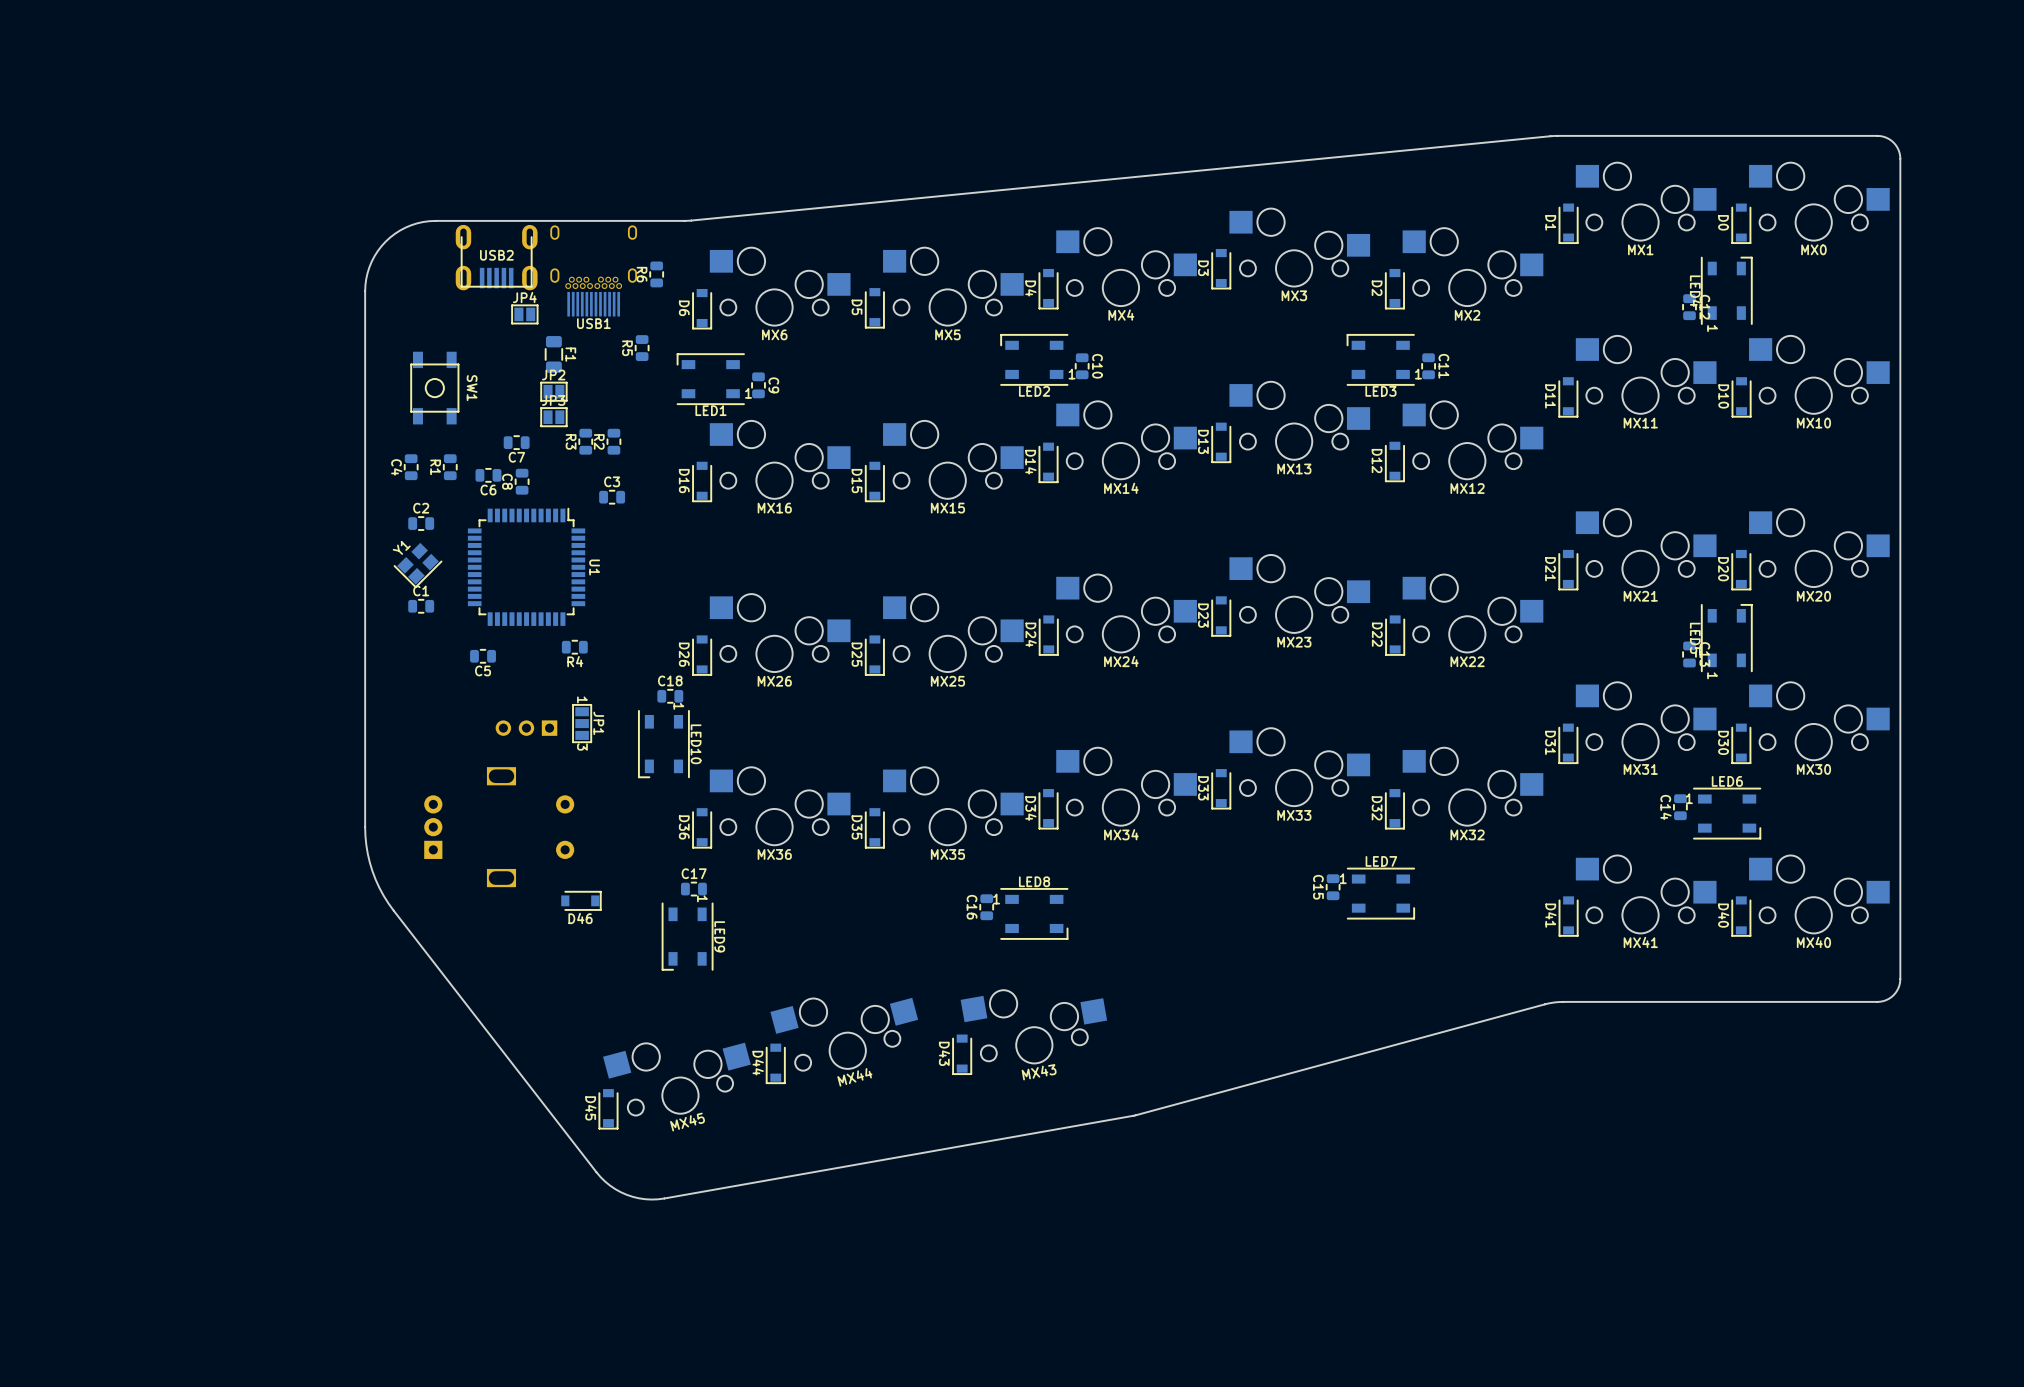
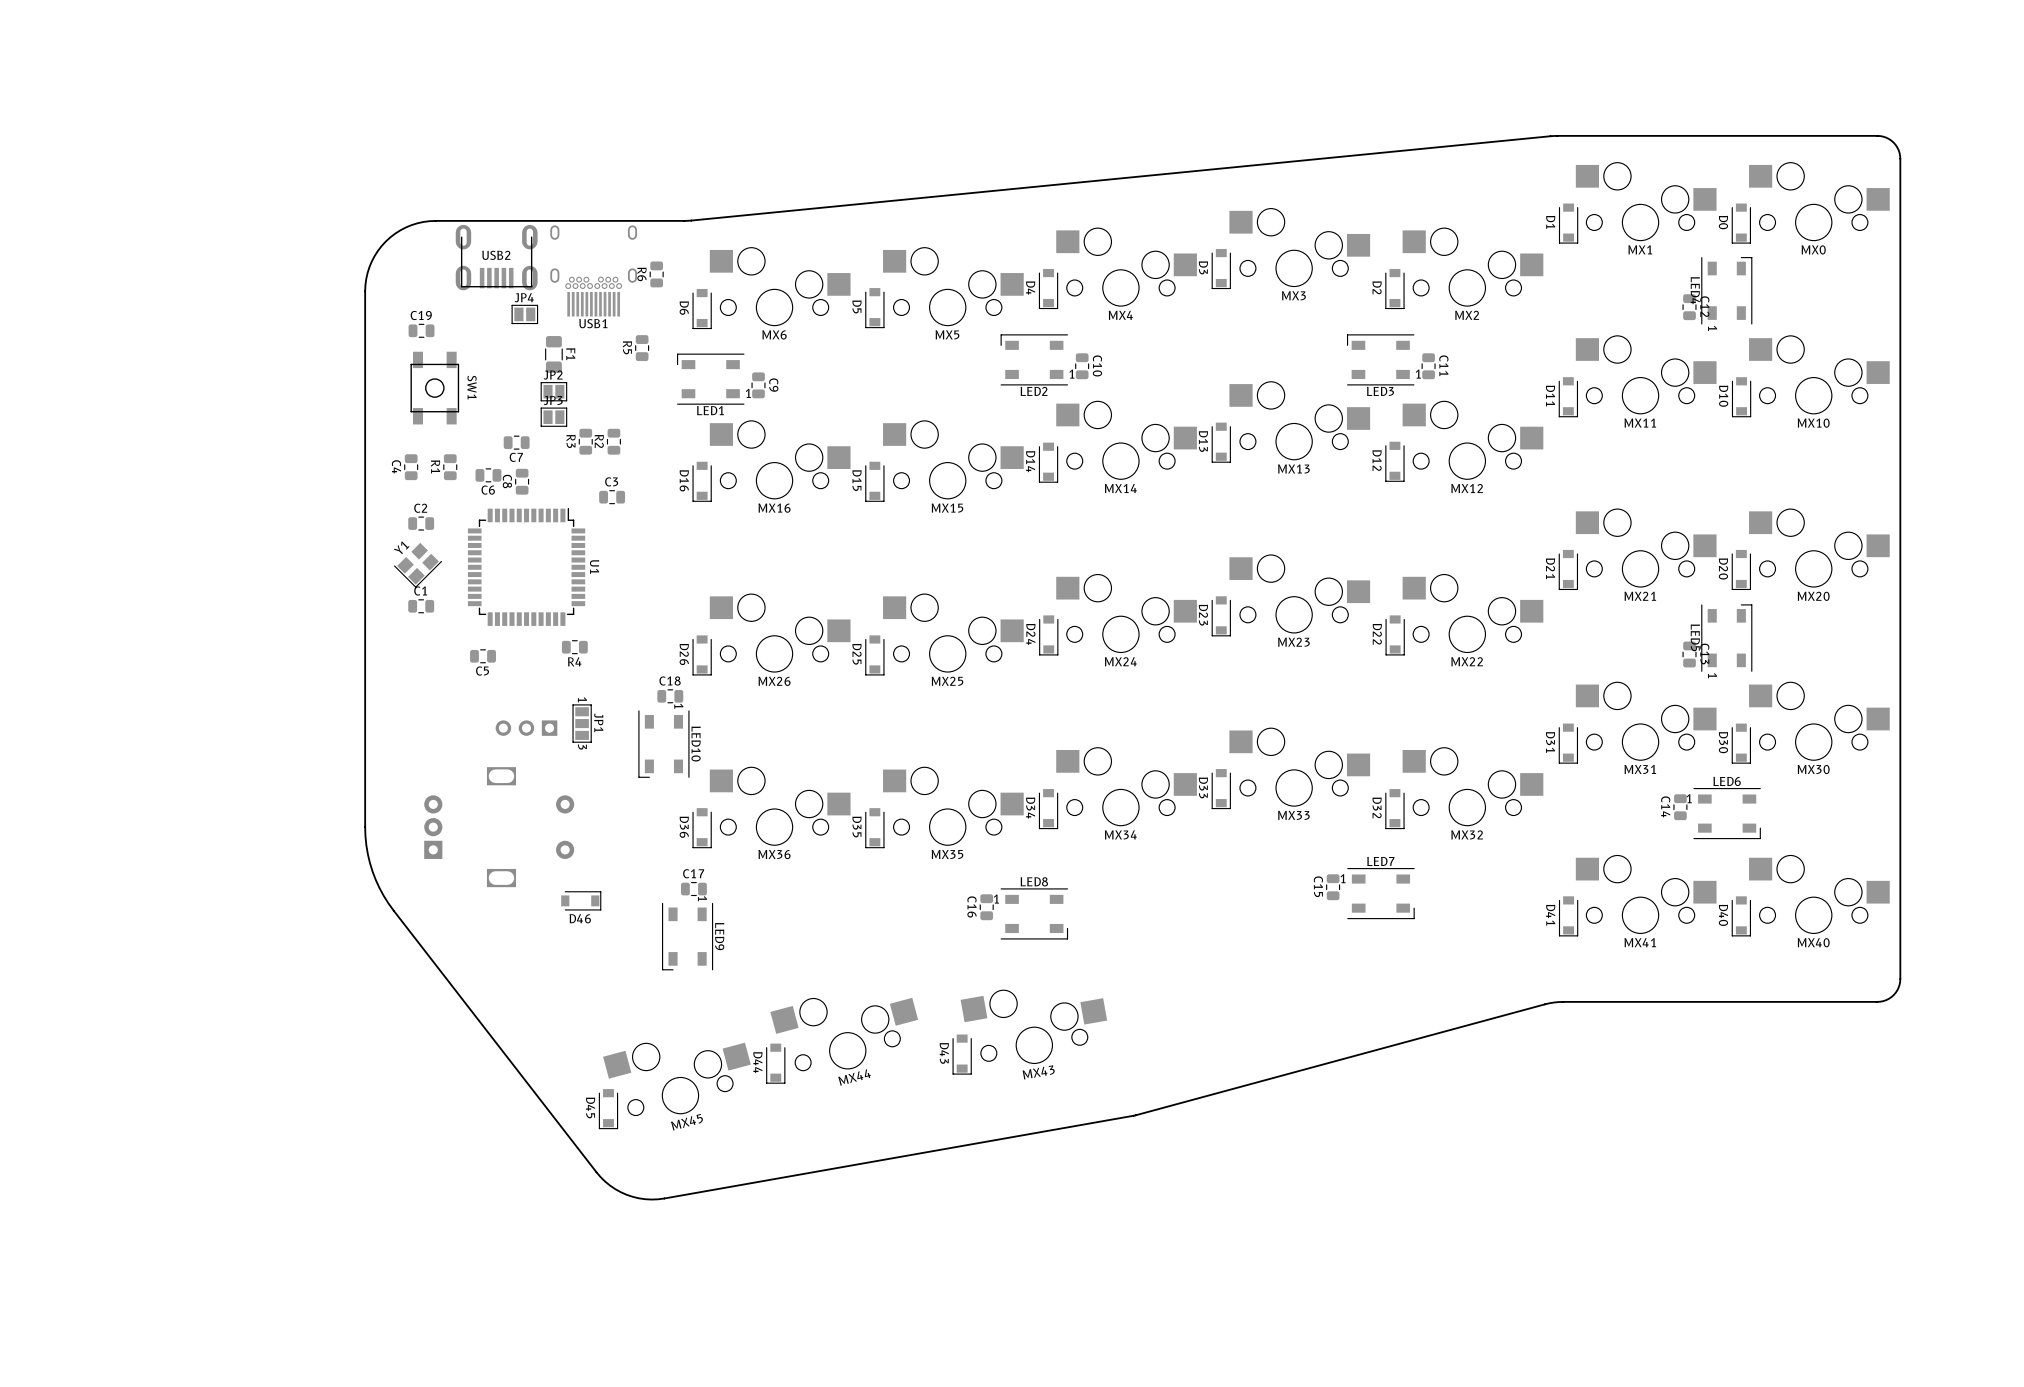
C19: none -> (421, 330)

